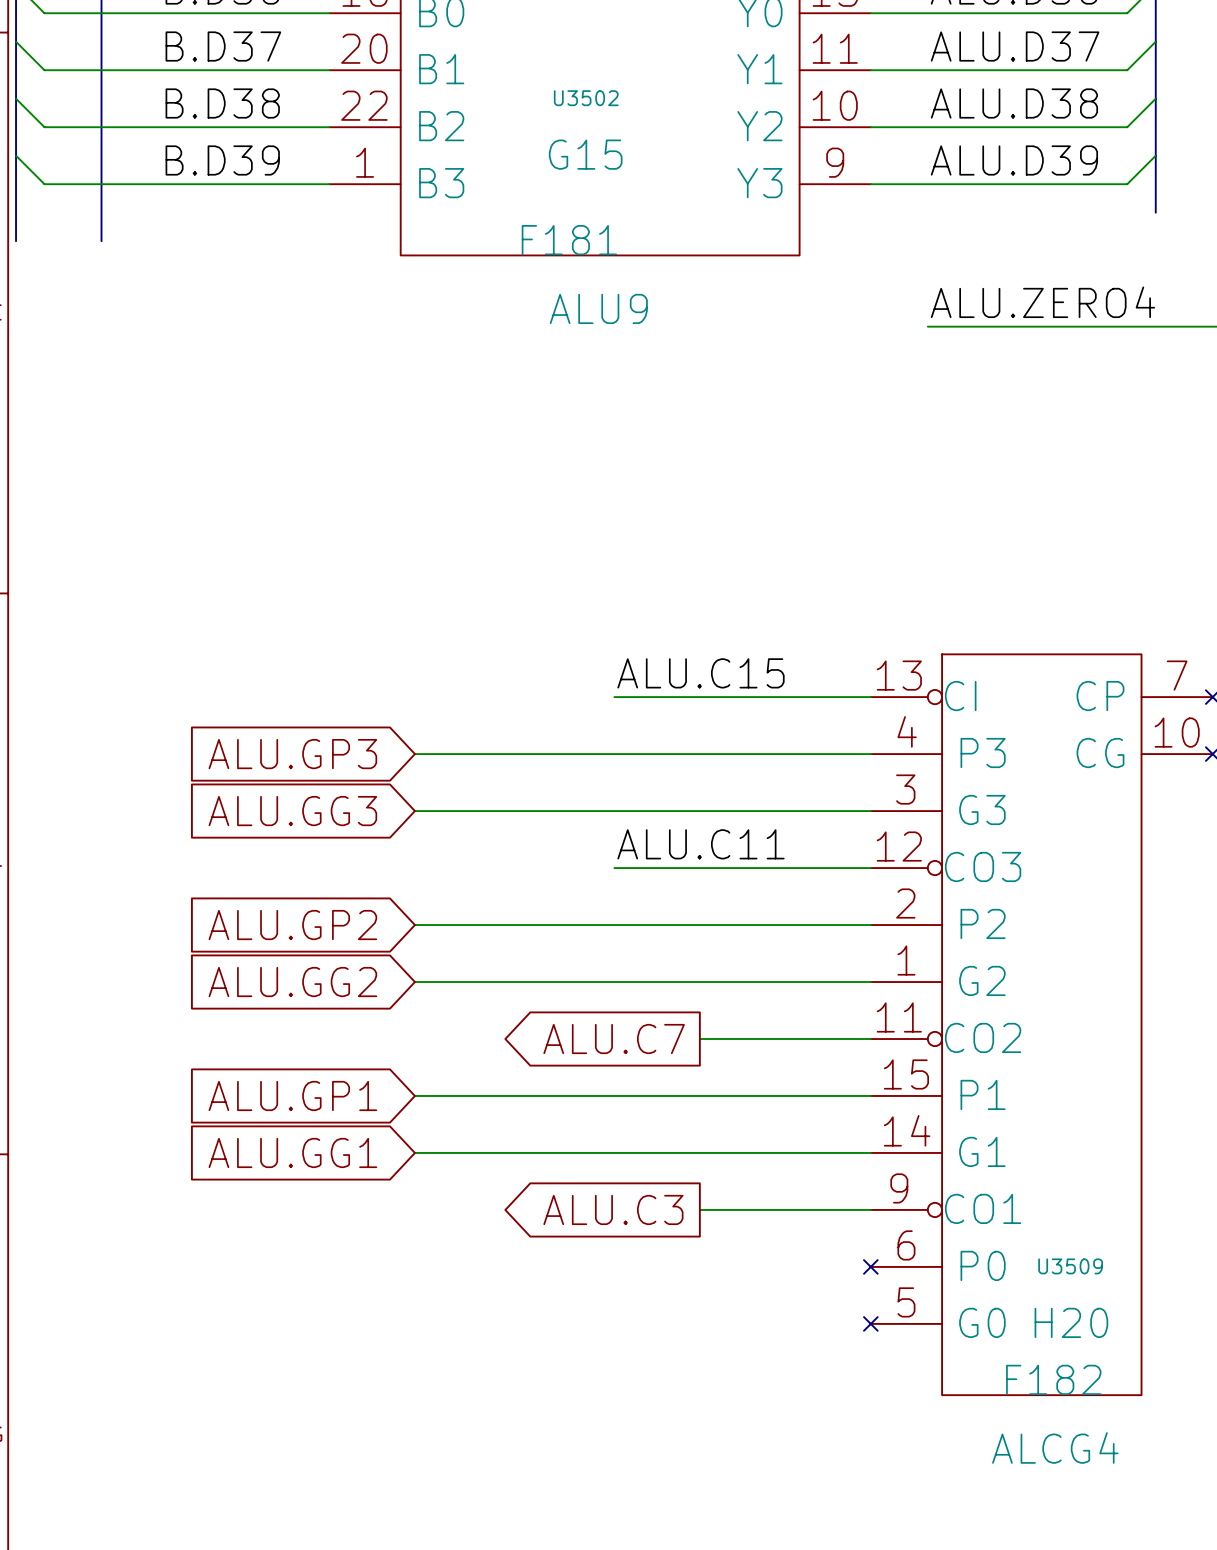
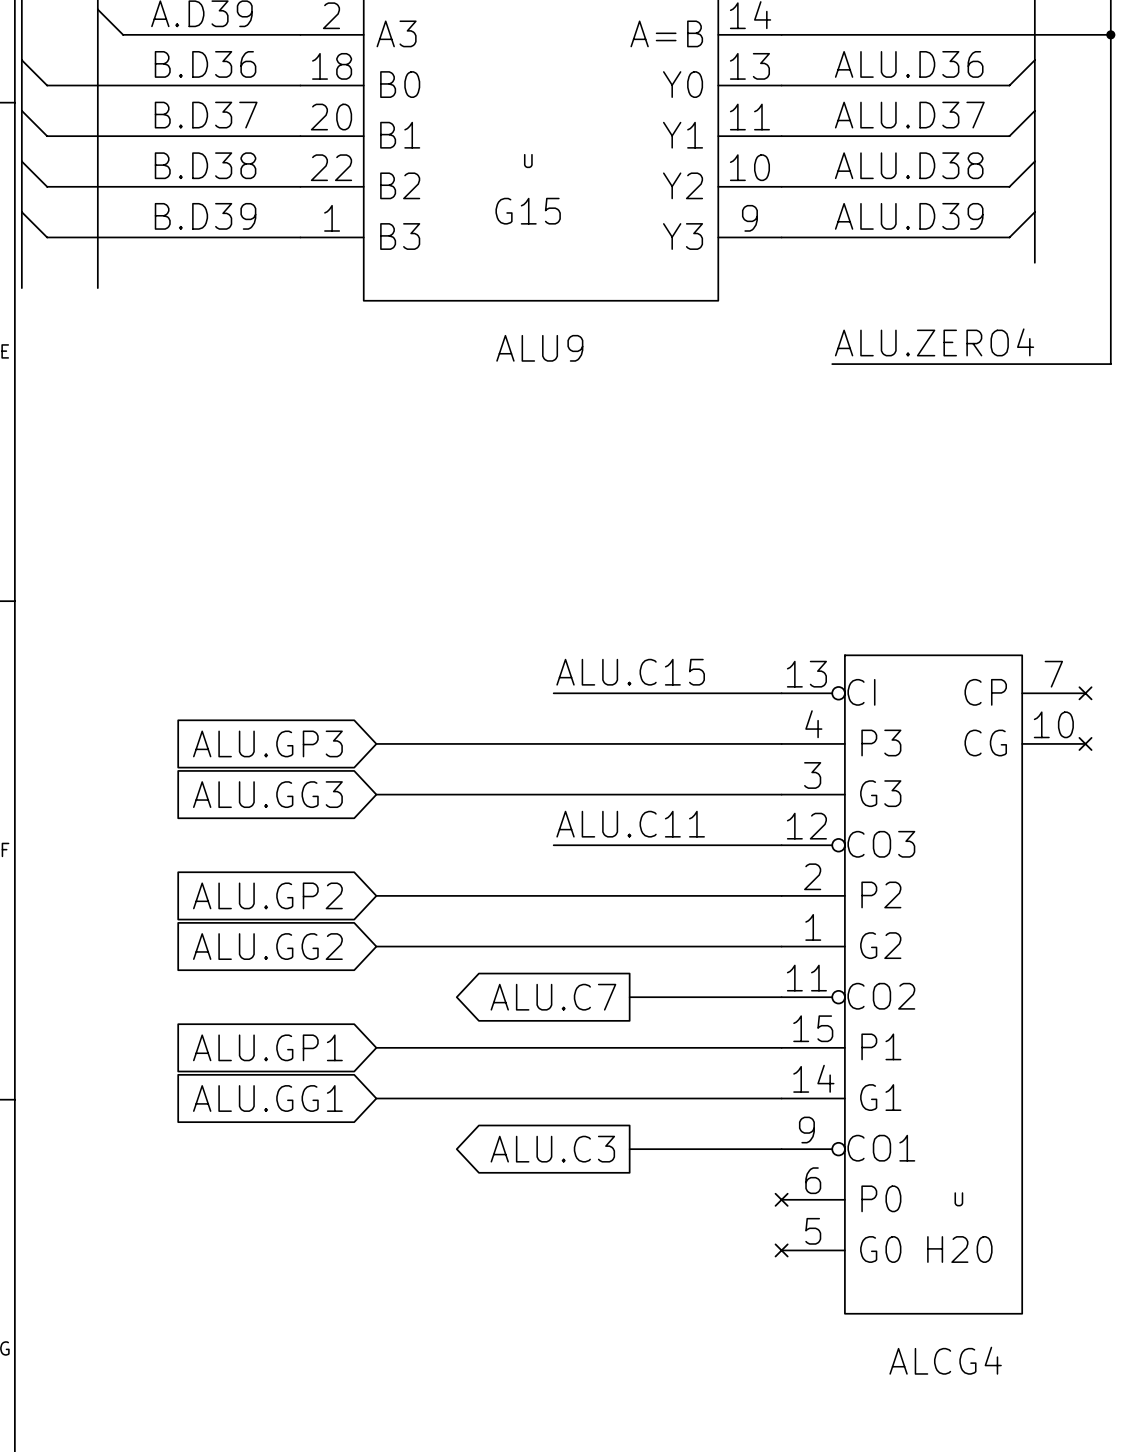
U3502 name: U3502 (586, 98) -> U (528, 161)
U3502 value: F181 (569, 240) -> none
U3509 name: U3509 (1070, 1266) -> U (958, 1199)
U3509 value: F182 (1053, 1379) -> none

